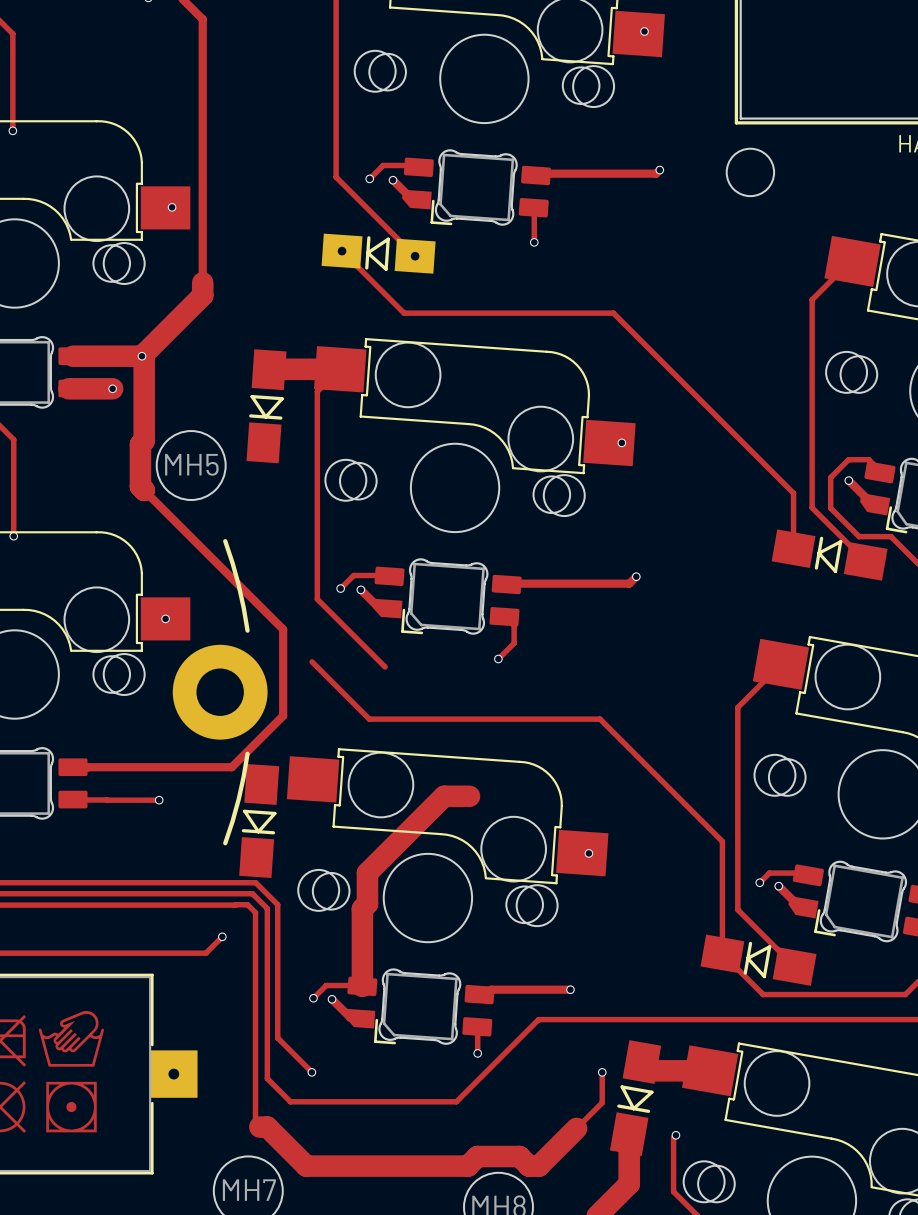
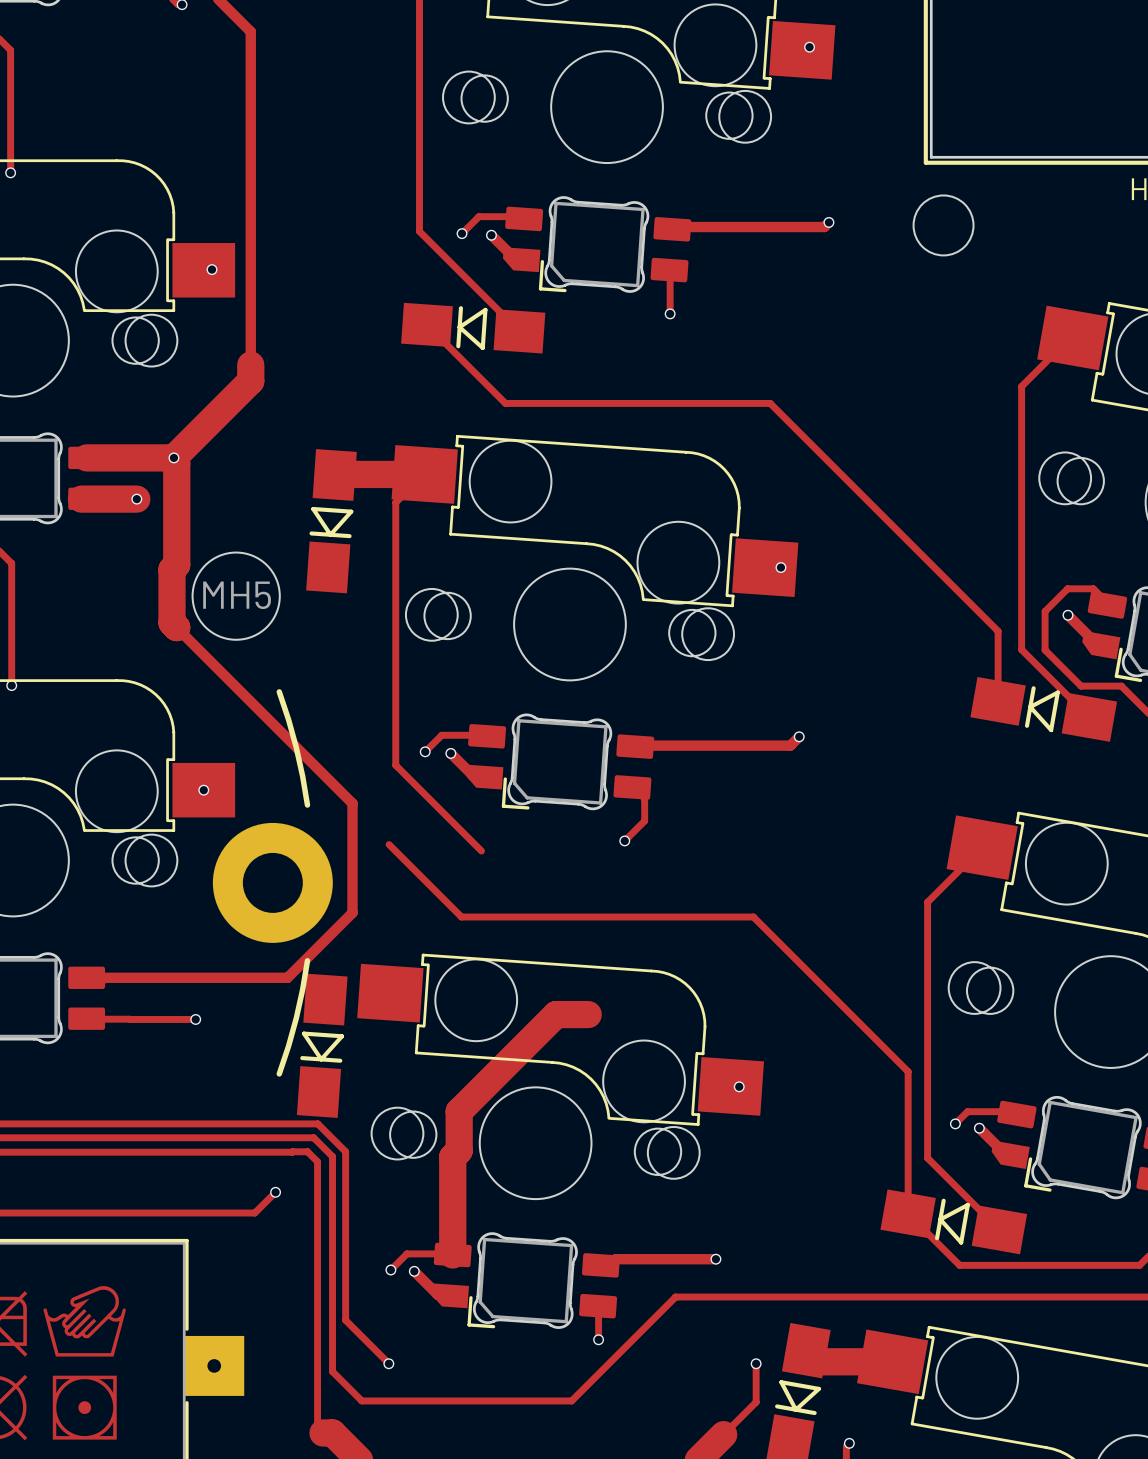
part footprint: [321, 233, 436, 274] -> [401, 302, 546, 354]

